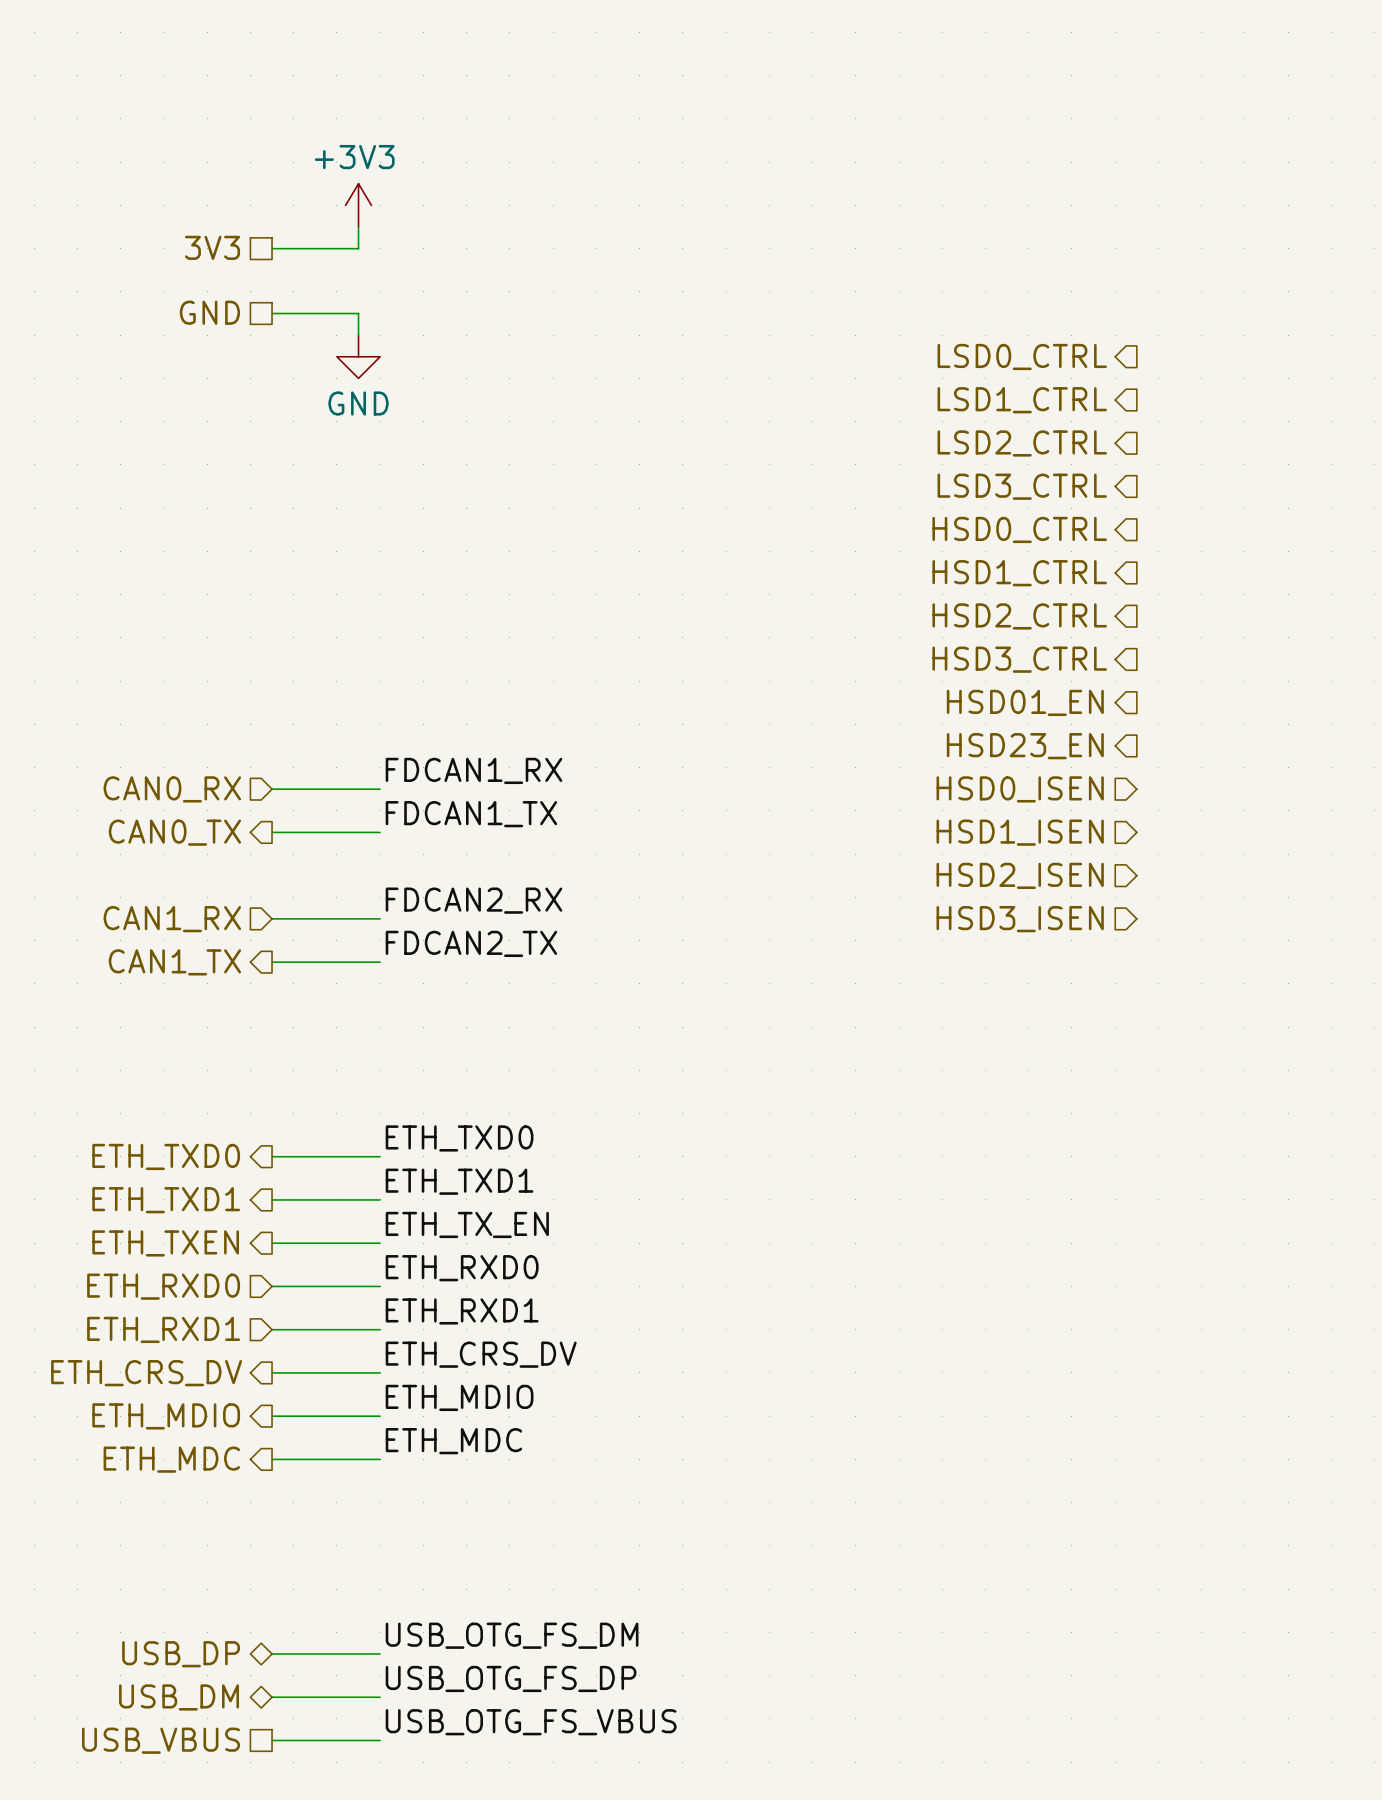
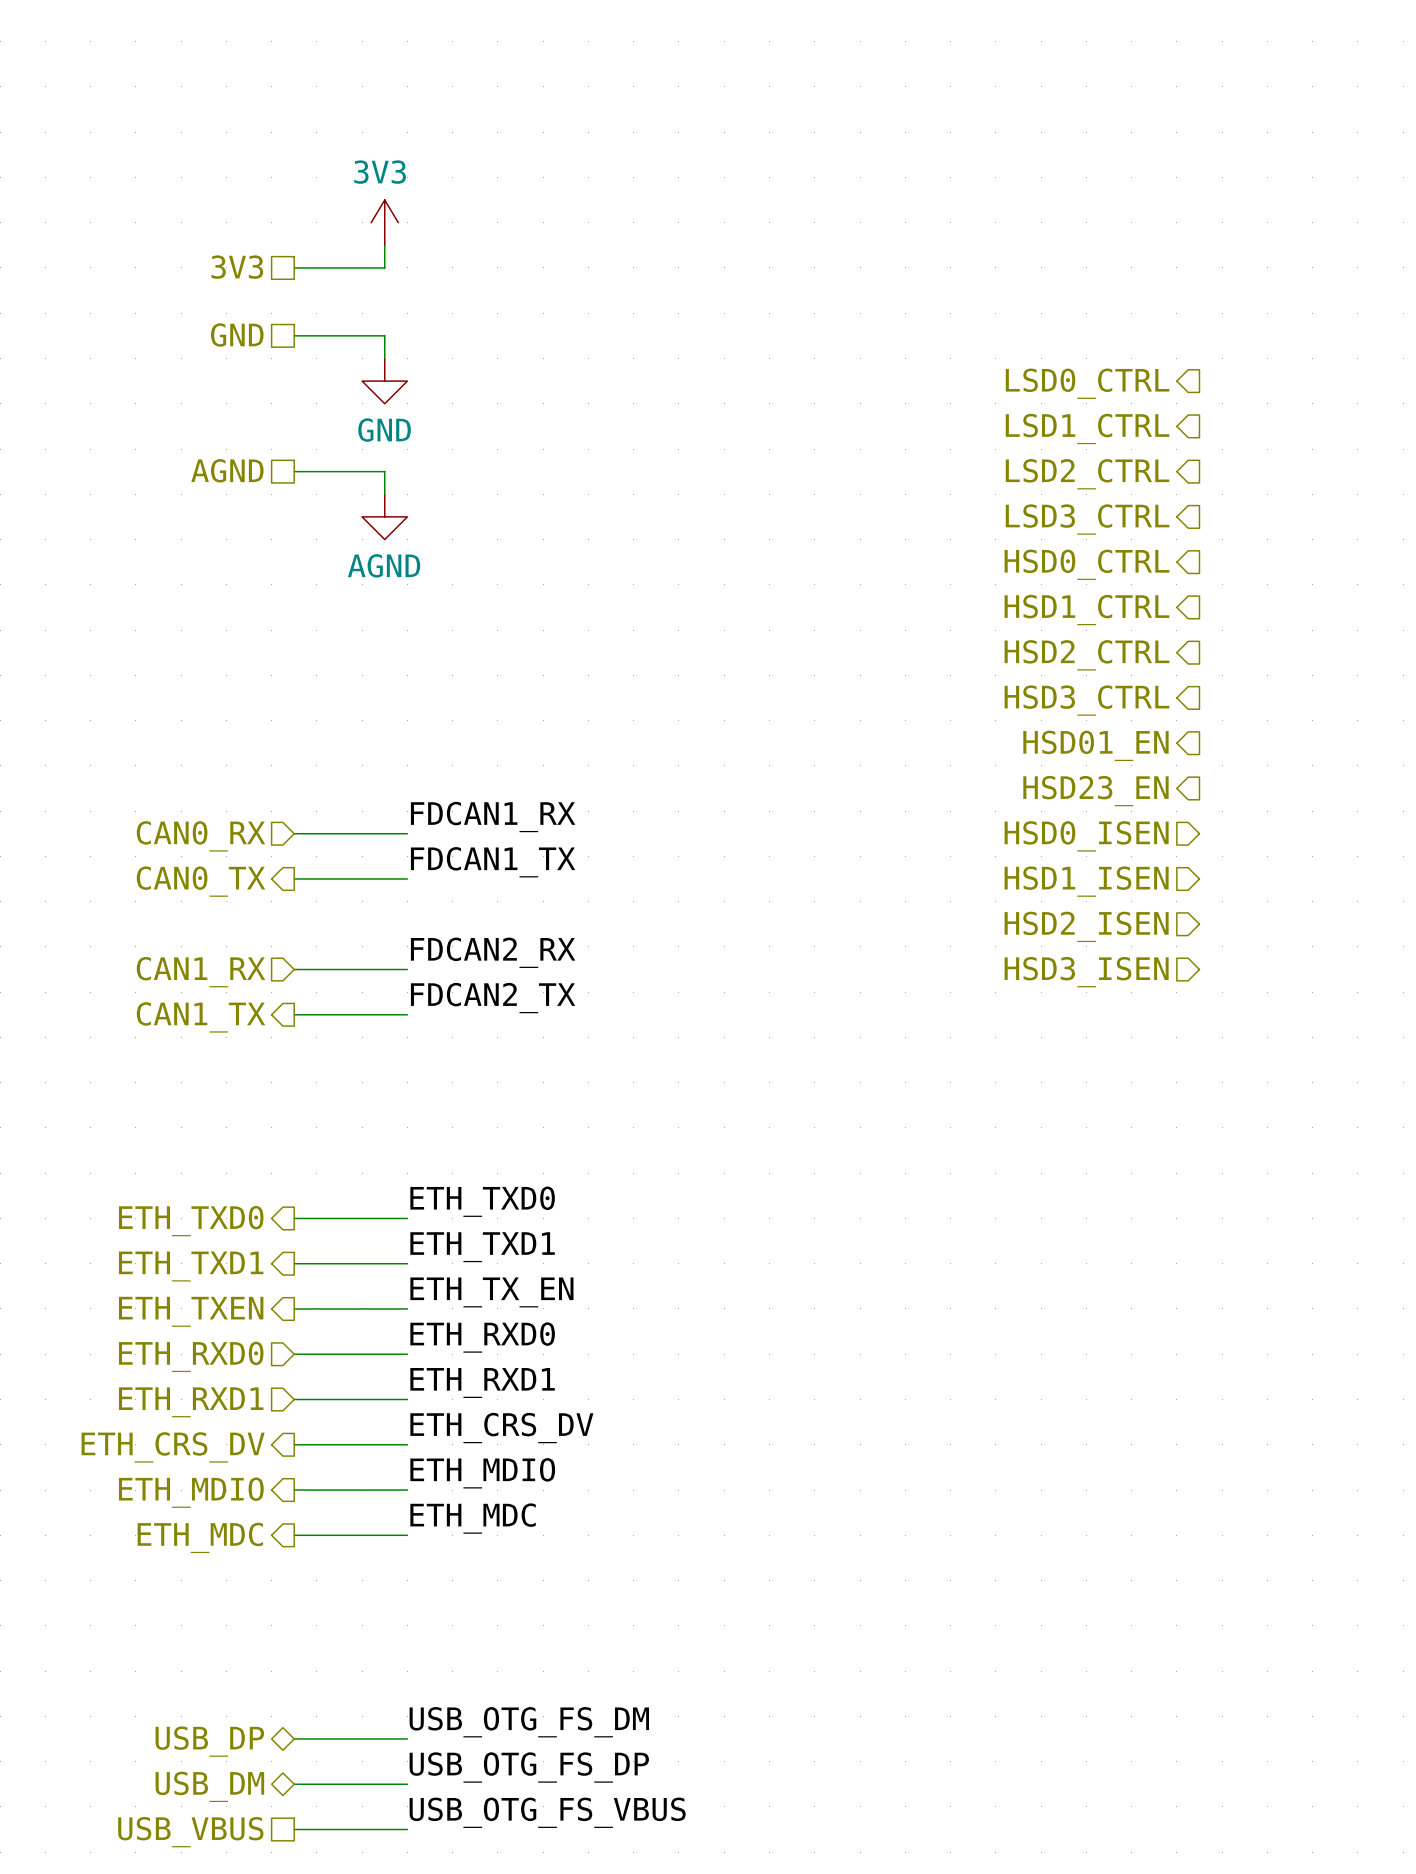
power symbol: +3V3 (358, 205) -> 3V3 (384, 222)
hierarchical label: none -> AGND (227, 470)
wire: none -> (294, 471) (384, 471) (384, 494)
power symbol: none -> AGND (384, 516)

